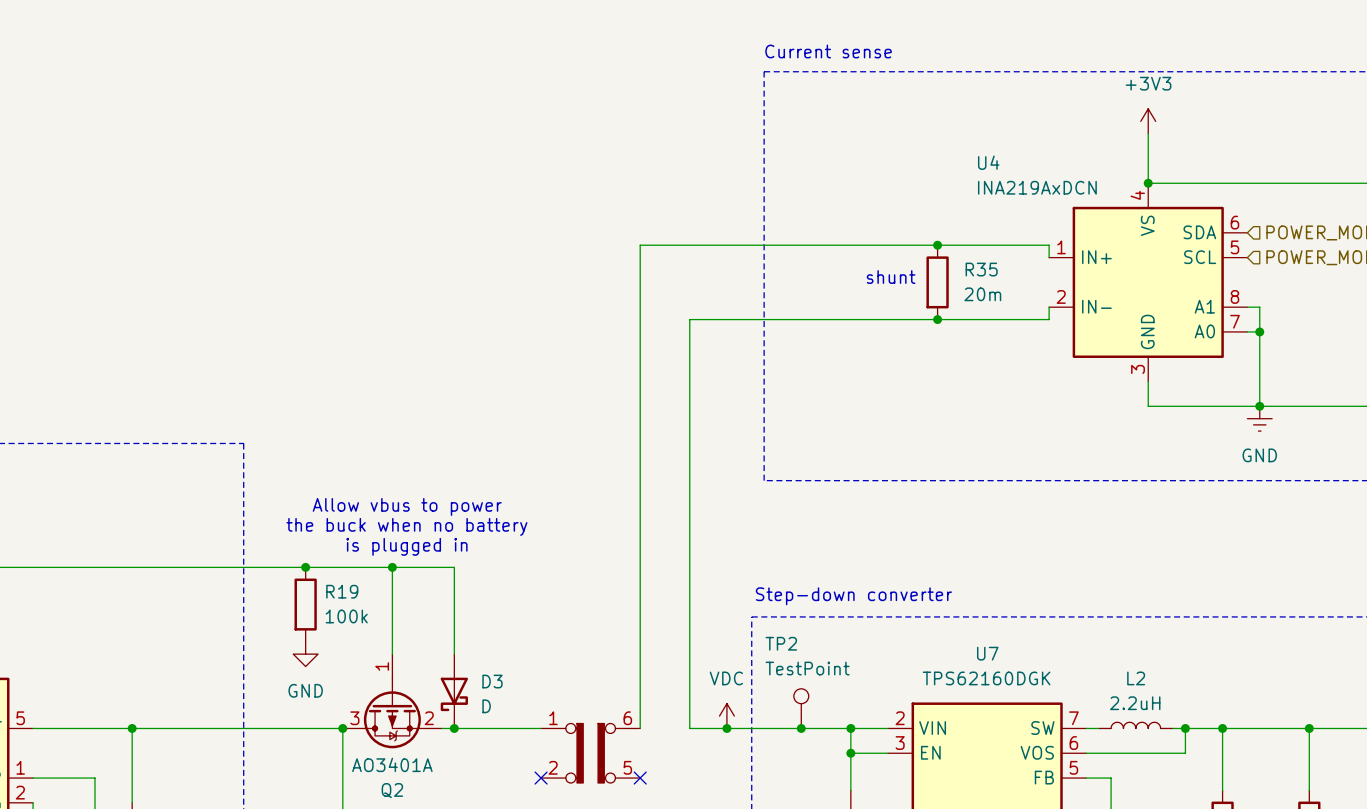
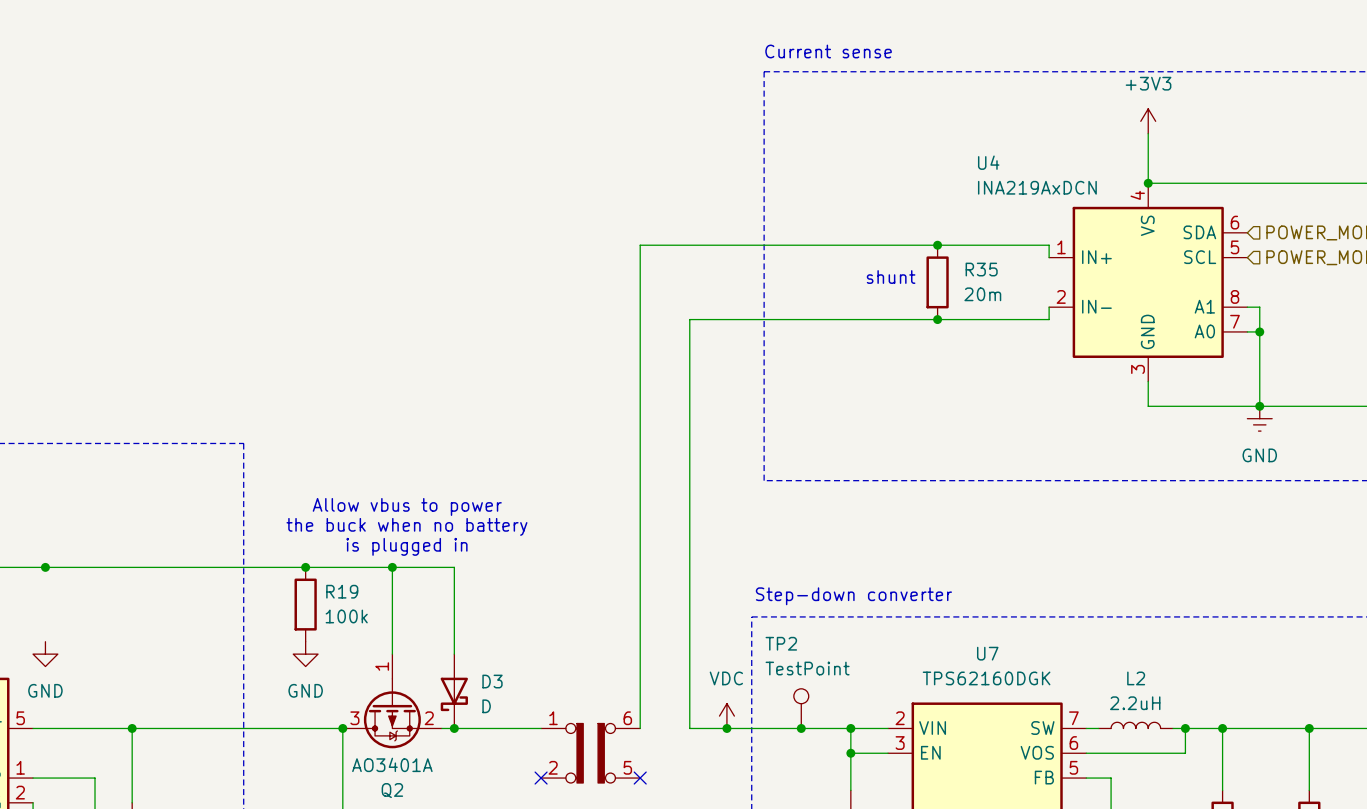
junction: none -> (45, 567)
power symbol: none -> GND (45, 654)

